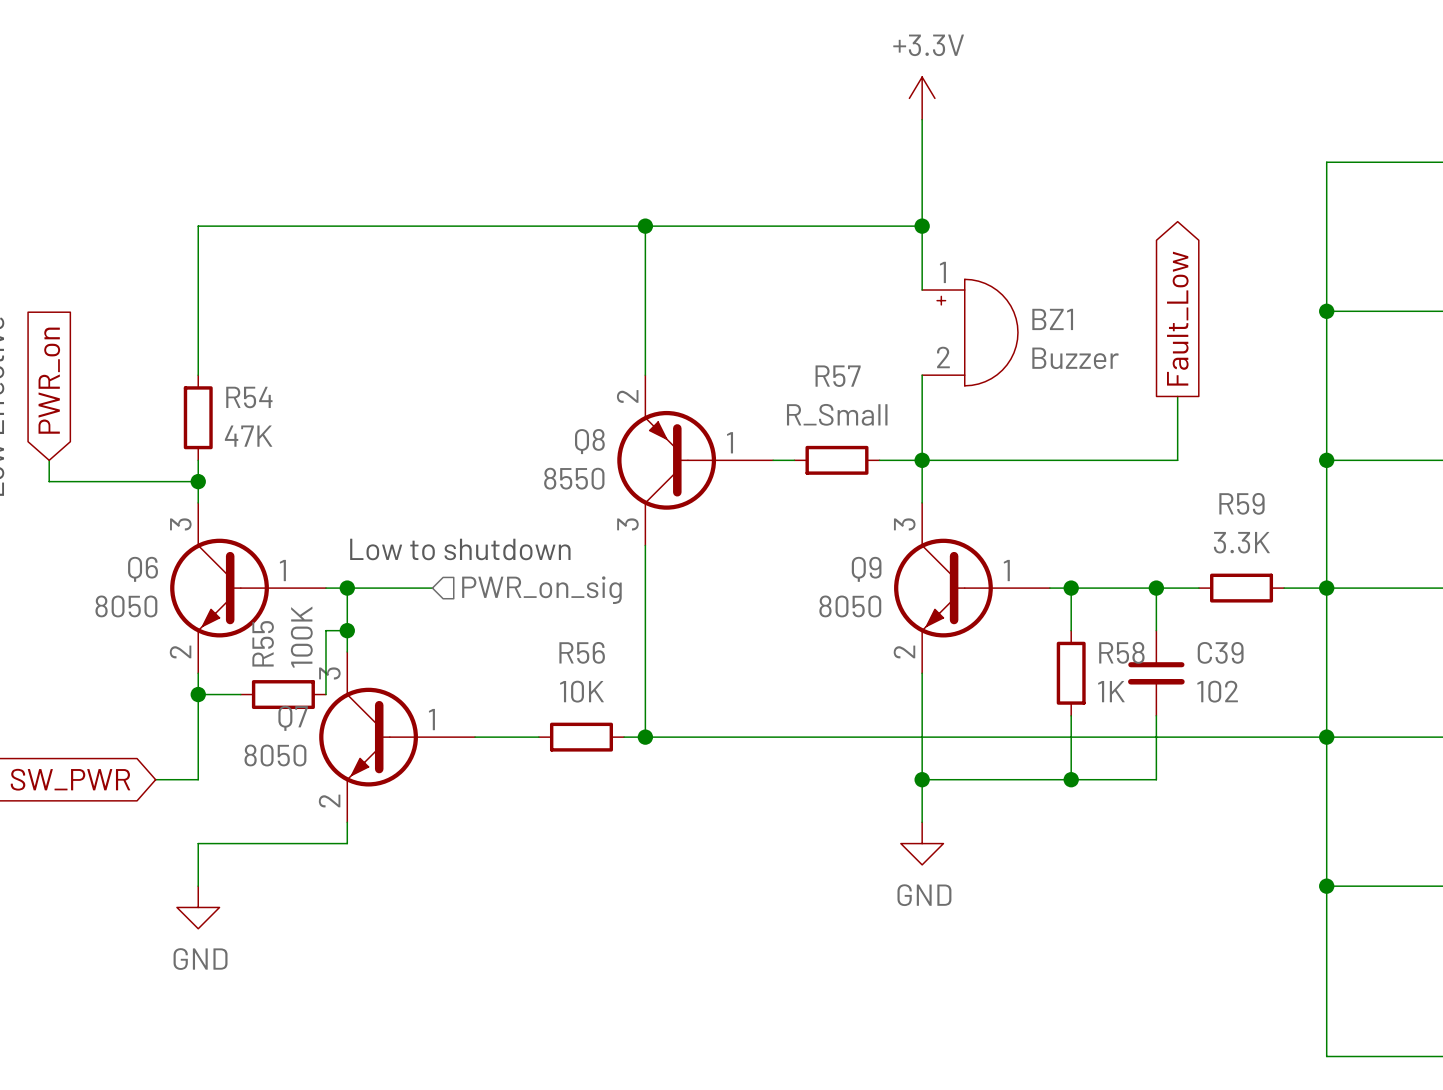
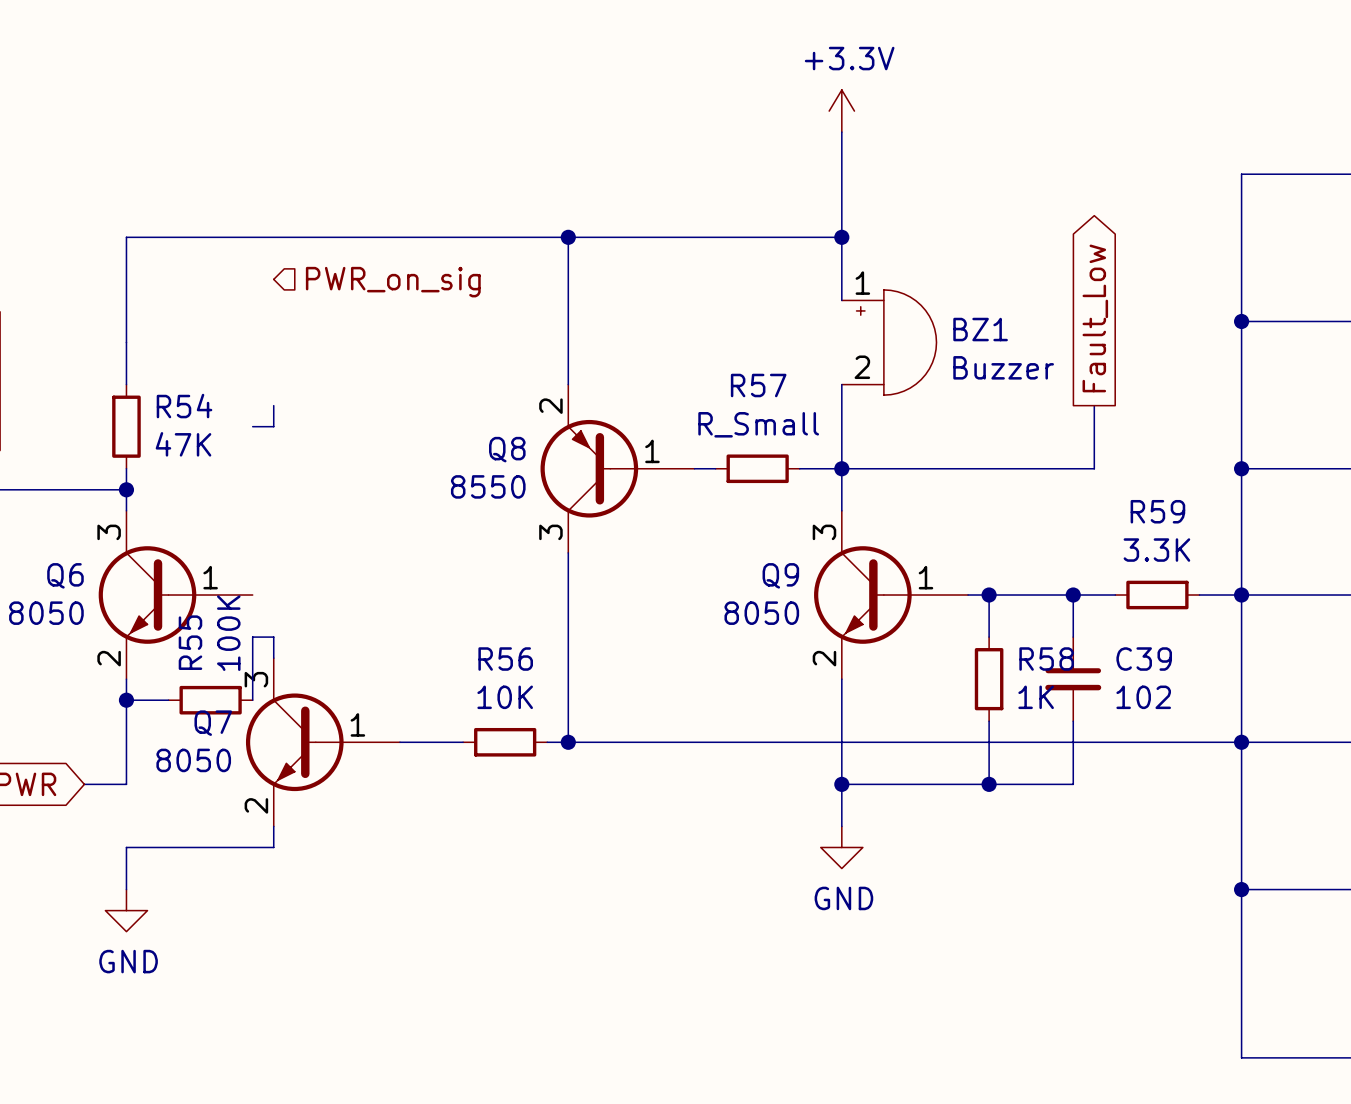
wire: none -> (273, 405) (273, 426) (252, 426)
text: Low to shutdown (460, 549) -> none
wire: (325, 588) (432, 588) -> none
wire: (347, 588) (347, 630) -> none
junction: (347, 588) -> none
hierarchical label position: PWR_on_sig (541, 590) -> PWR_on_sig (393, 282)
junction: (347, 630) -> none

